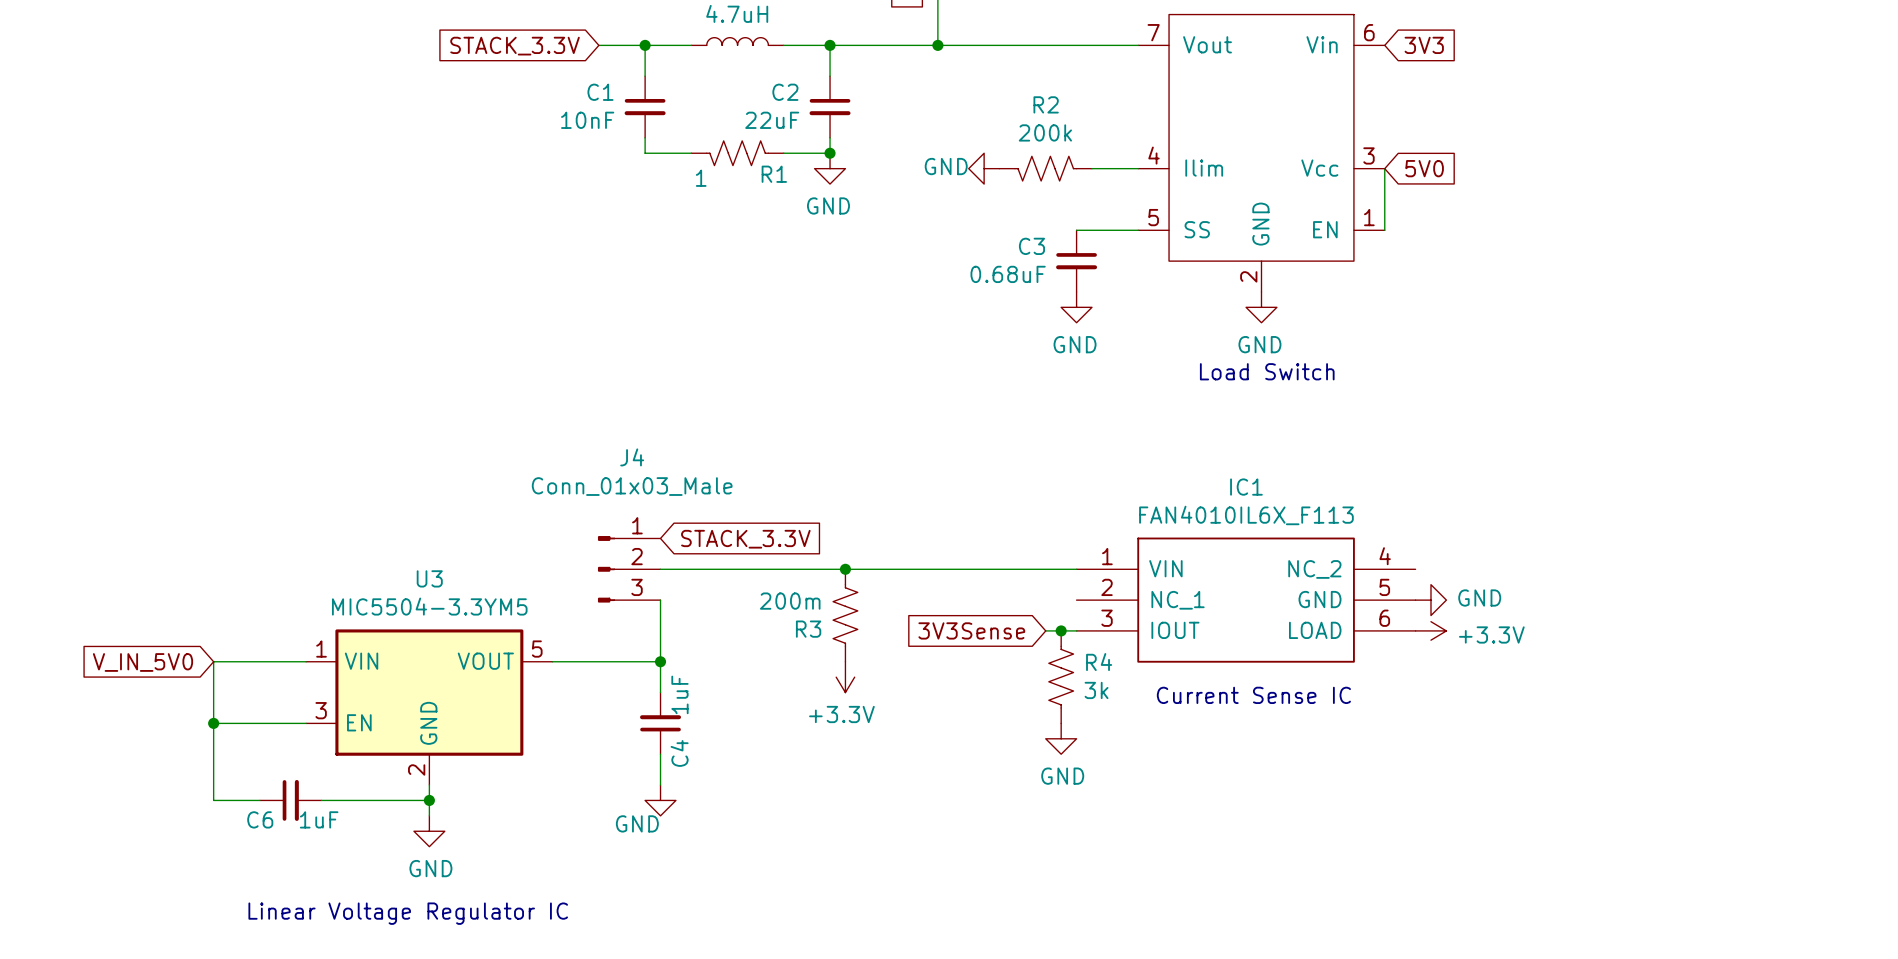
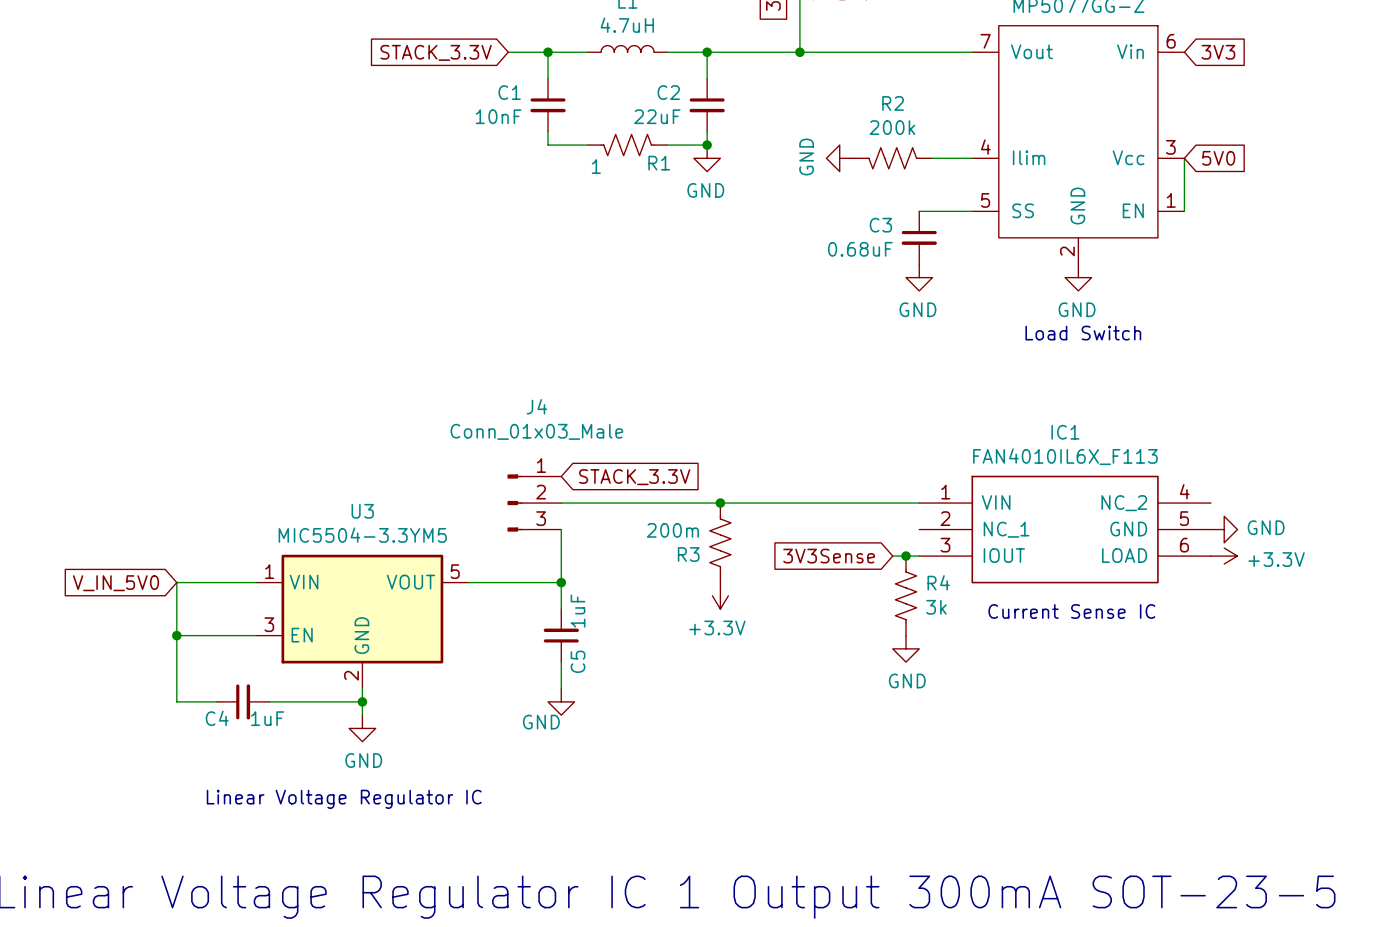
power symbol text rotation: 0° (946, 166) -> 90° counterclockwise (806, 156)
C4 name: C4 (679, 753) -> C5 (578, 661)
C6 name: C6 (260, 819) -> C4 (217, 718)

